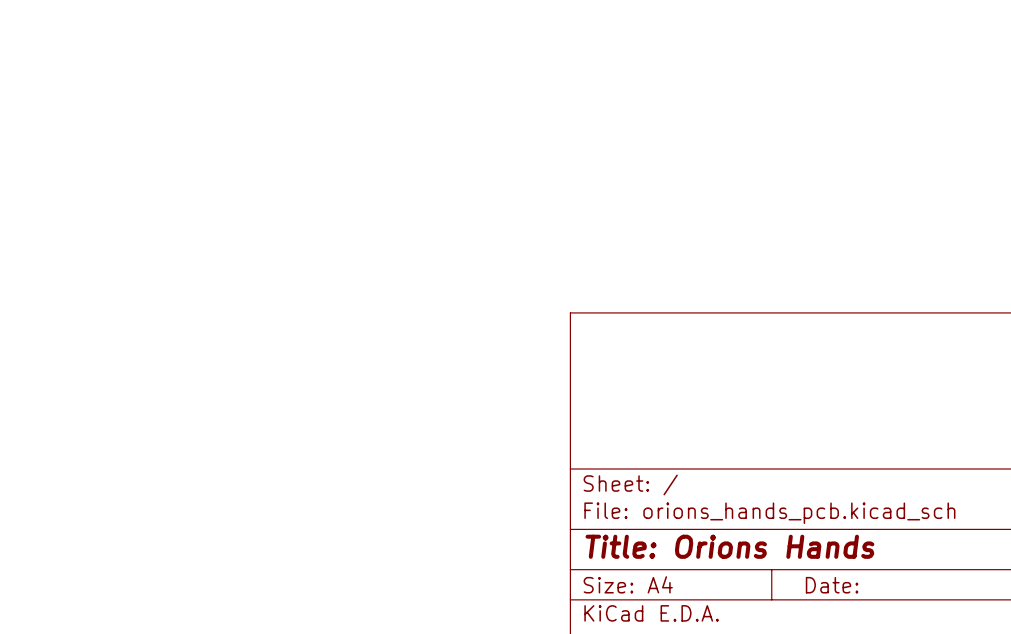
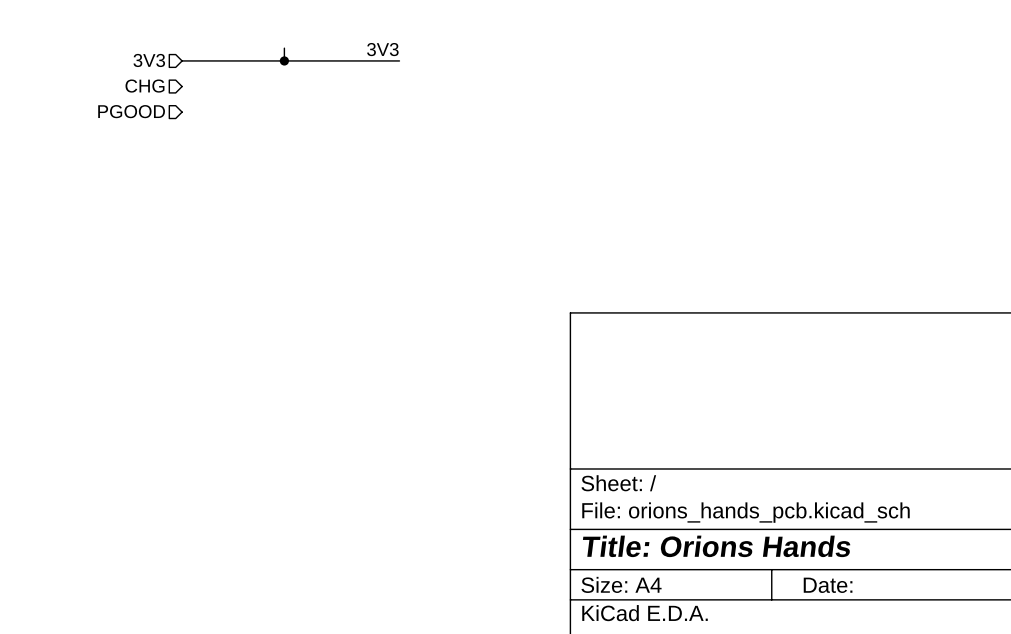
wire: none -> (284, 48) (284, 60)
label: none -> 3V3 (382, 49)
sheet pin: none -> 3V3 (149, 60)
wire: none -> (182, 60) (399, 60)
junction: none -> (284, 60)
sheet pin: none -> CHG (144, 86)
sheet pin: none -> PGOOD (131, 111)

